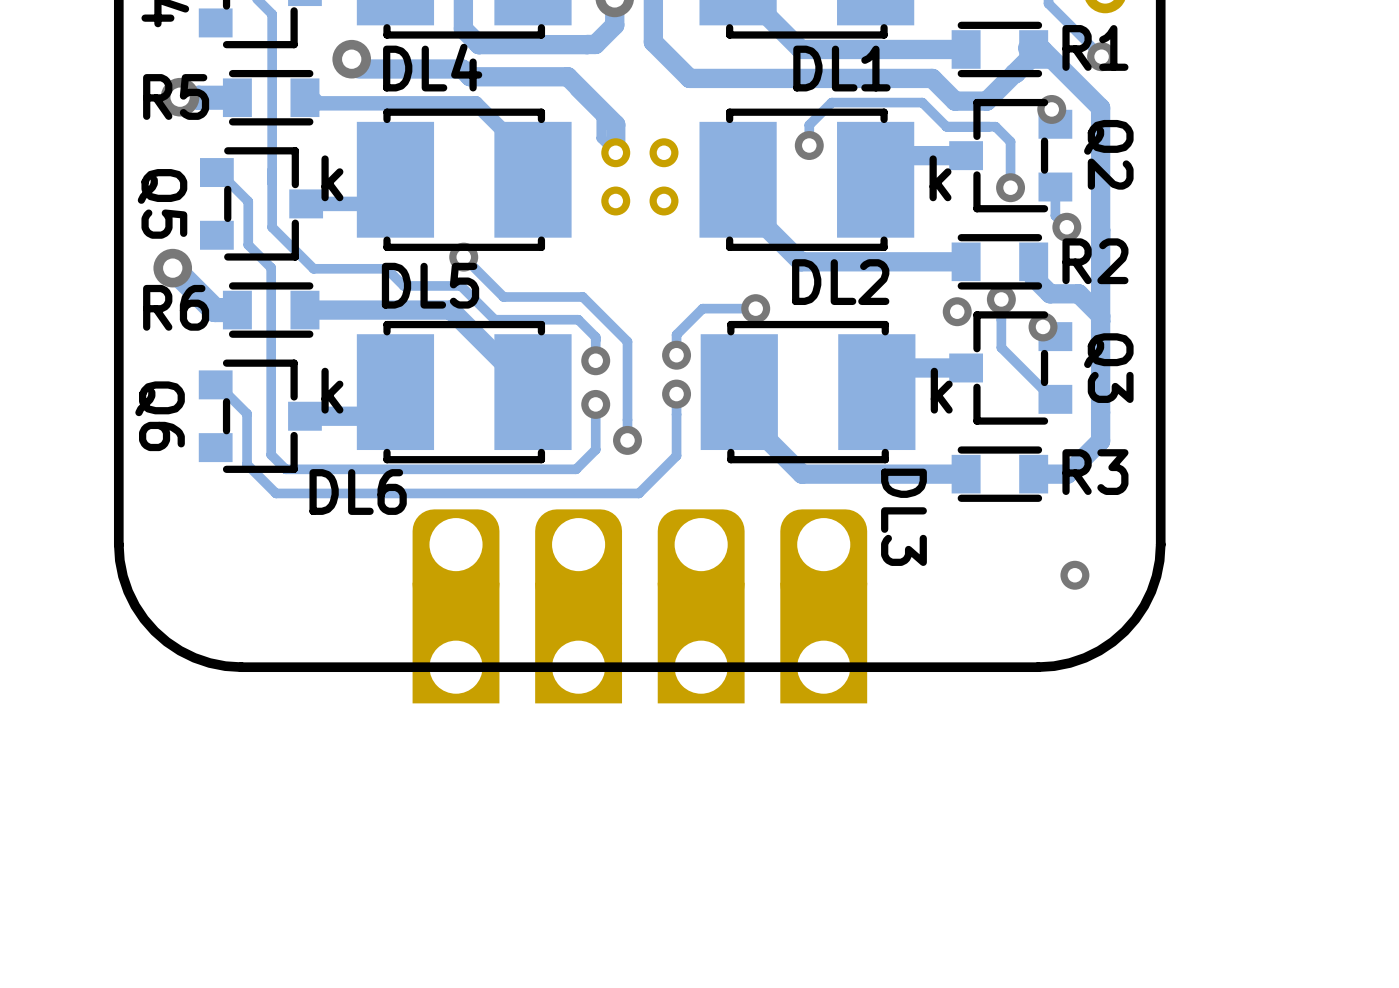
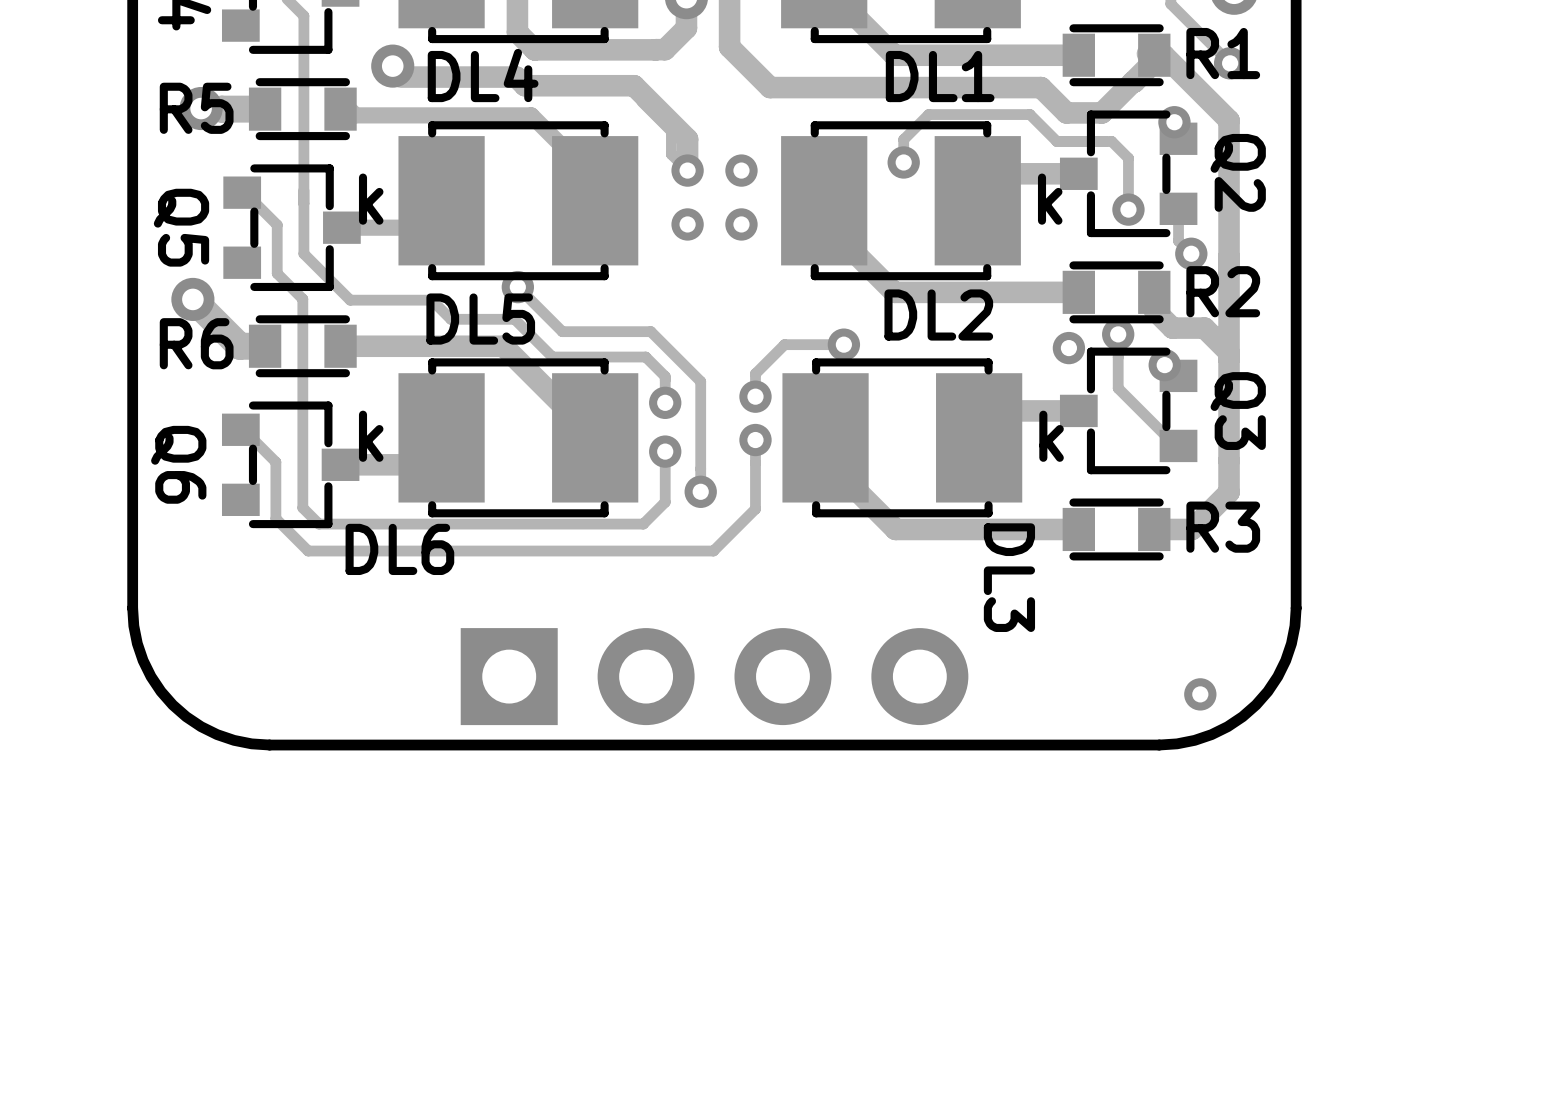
part footprint: [412, 509, 868, 704] -> [460, 628, 969, 726]
via position: (1074, 575) -> (1200, 694)

